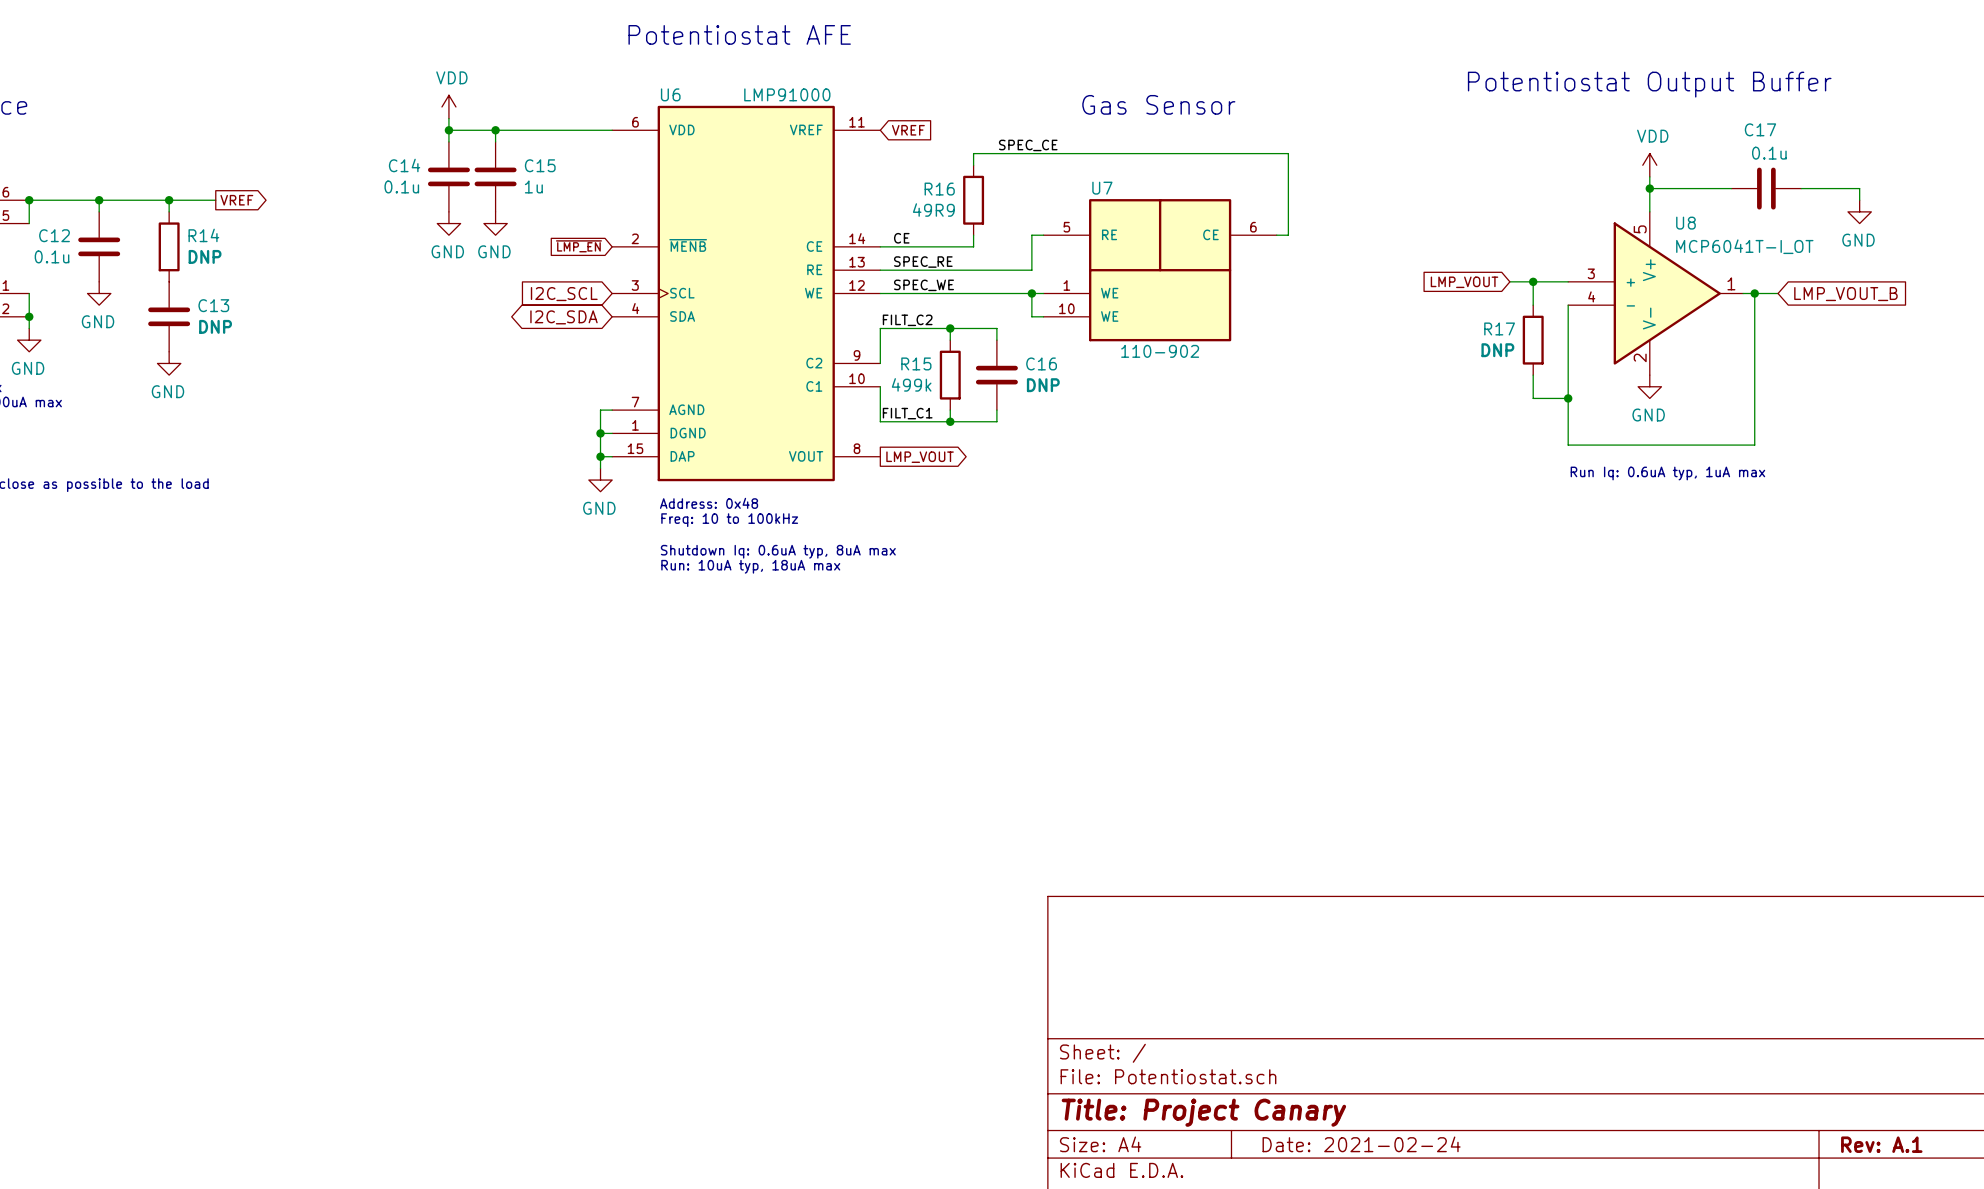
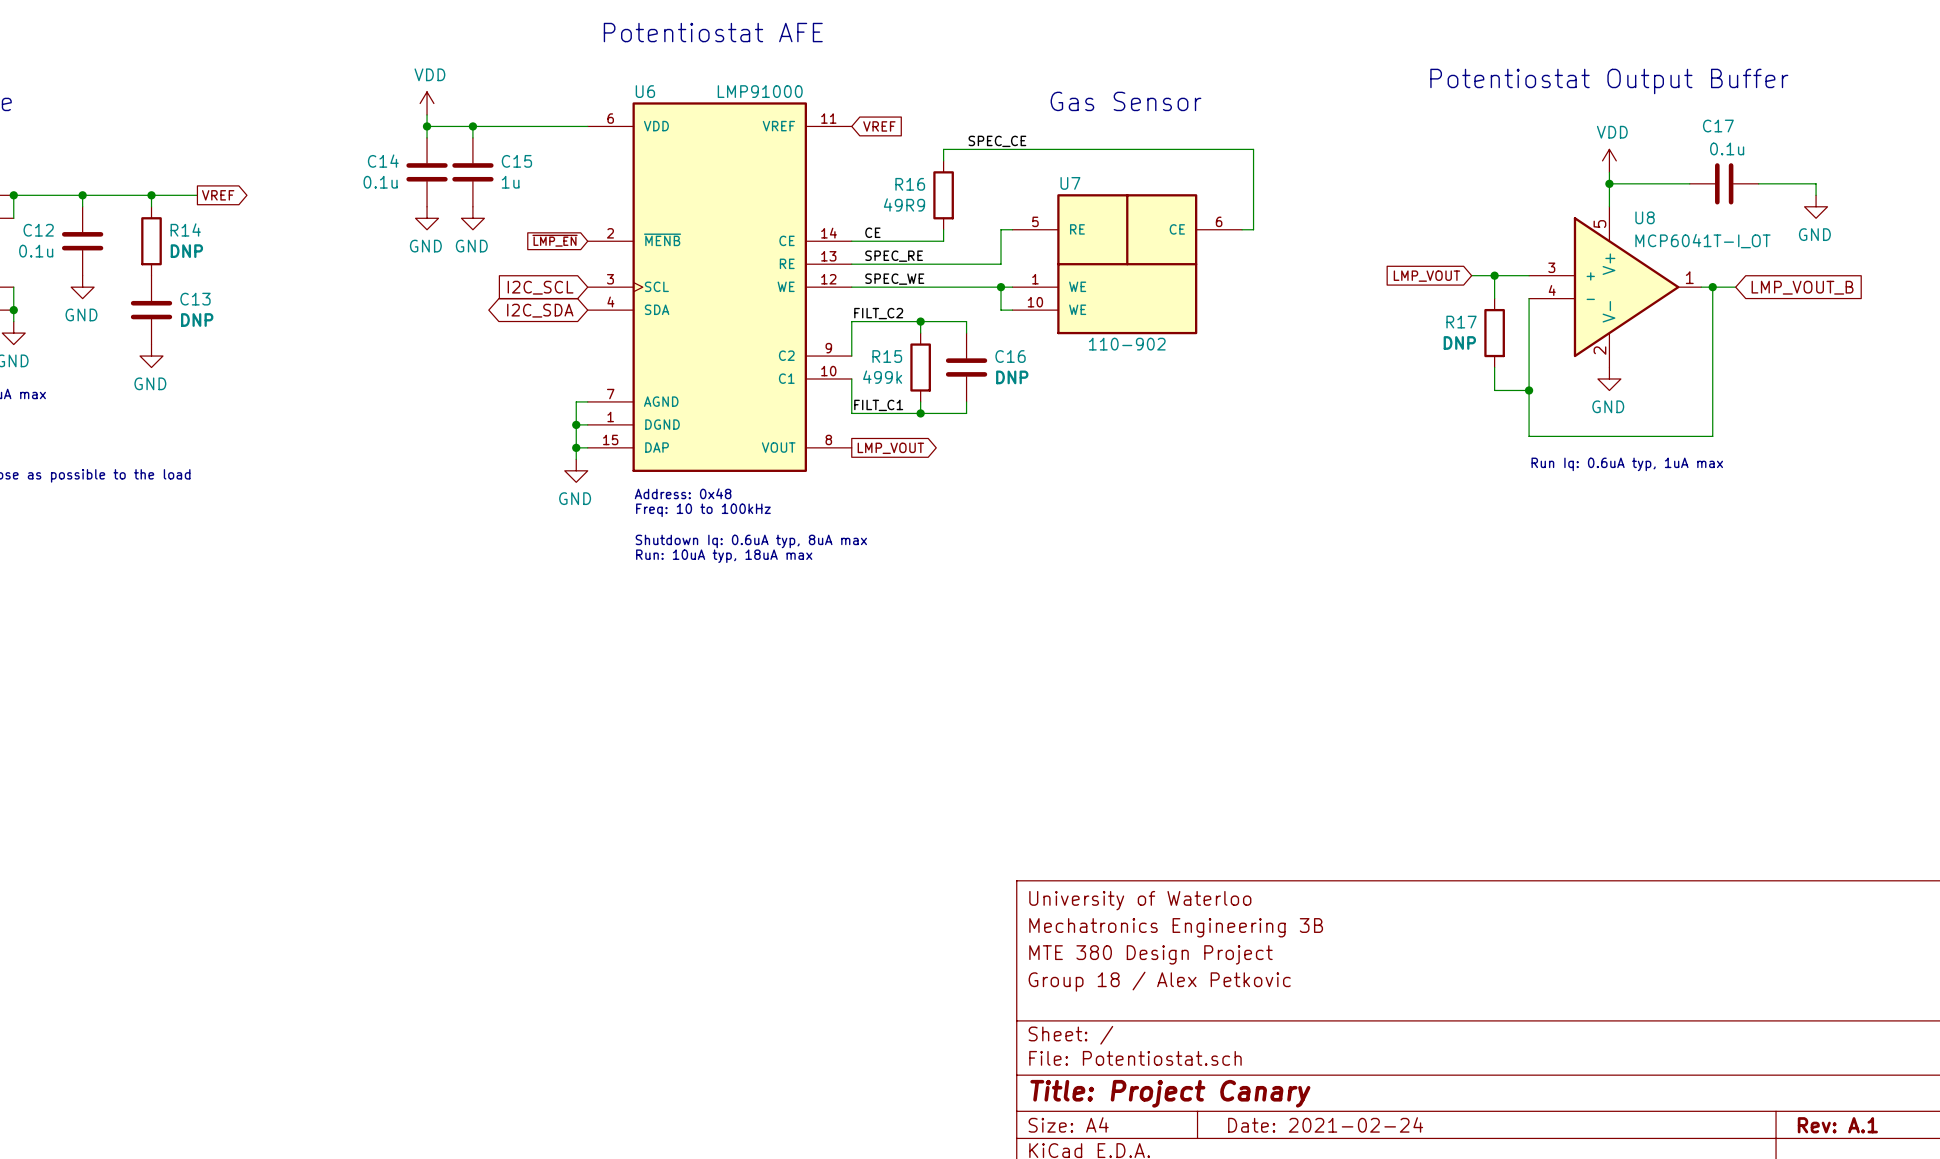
title block: none -> University of Waterloo (1140, 900)
title block: none -> Mechatronics Engineering 3B (1176, 927)
title block: none -> MTE 380 Design Project (1150, 954)
title block: none -> Group 18 / Alex Petkovic (1159, 981)

